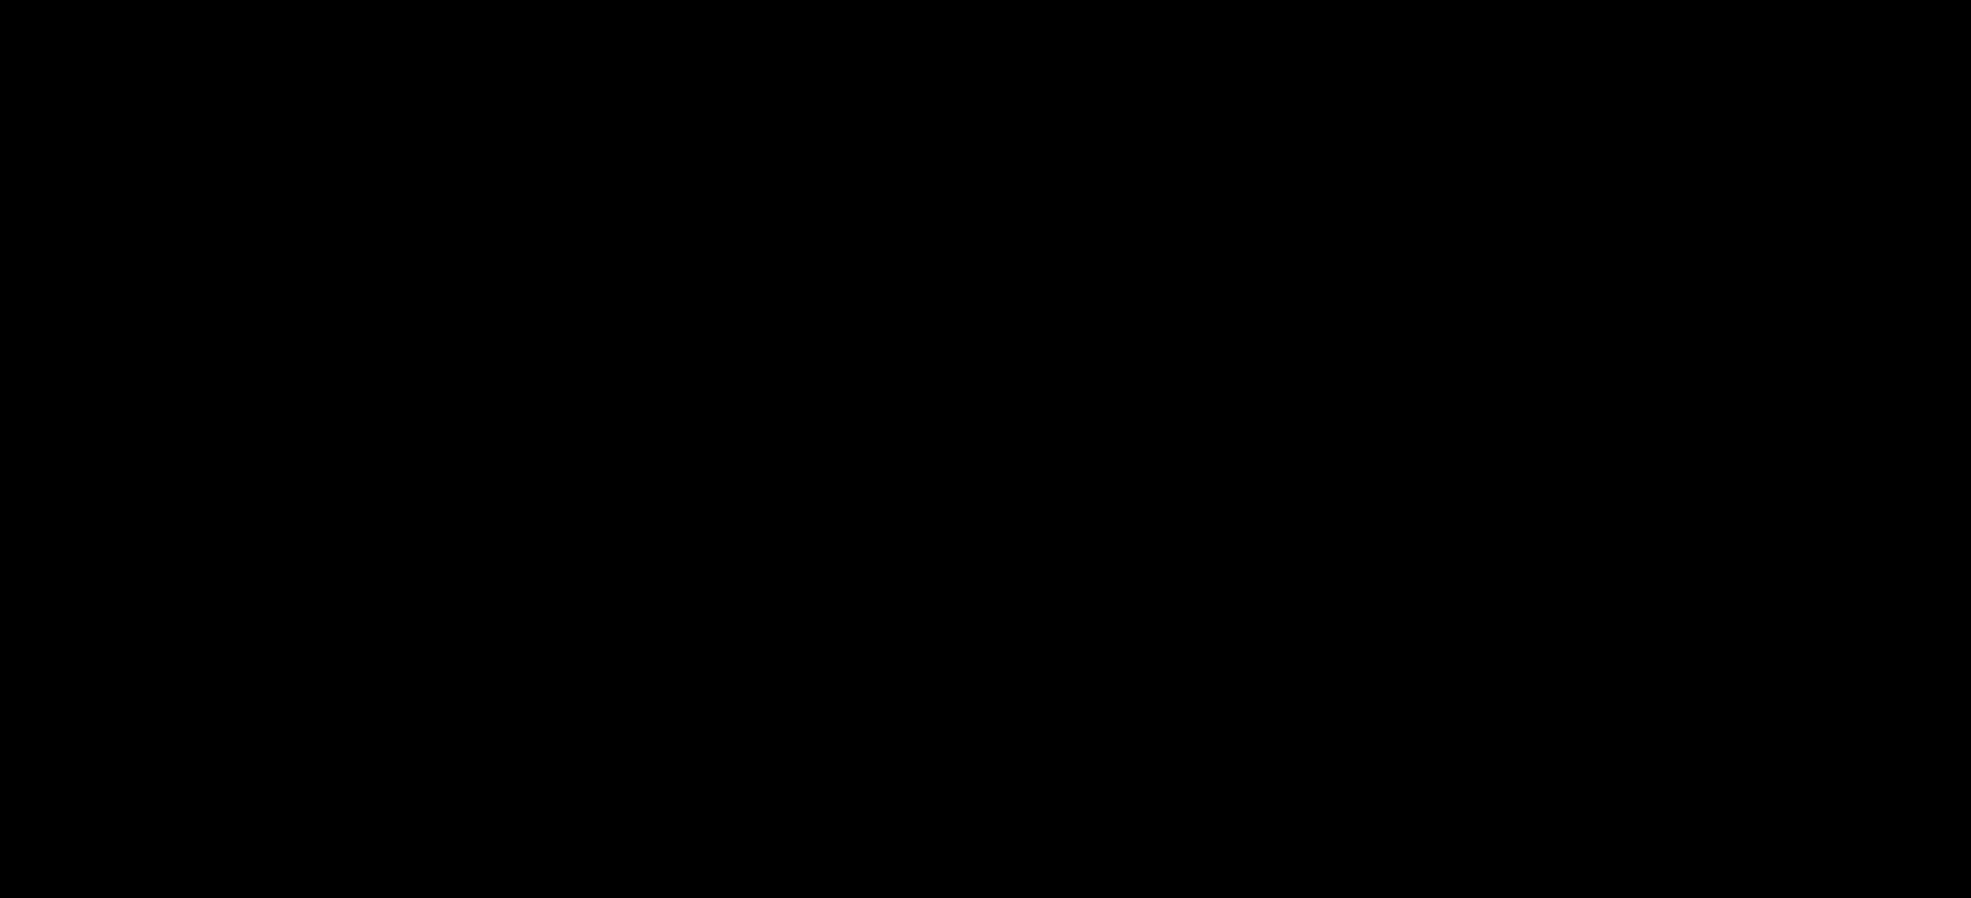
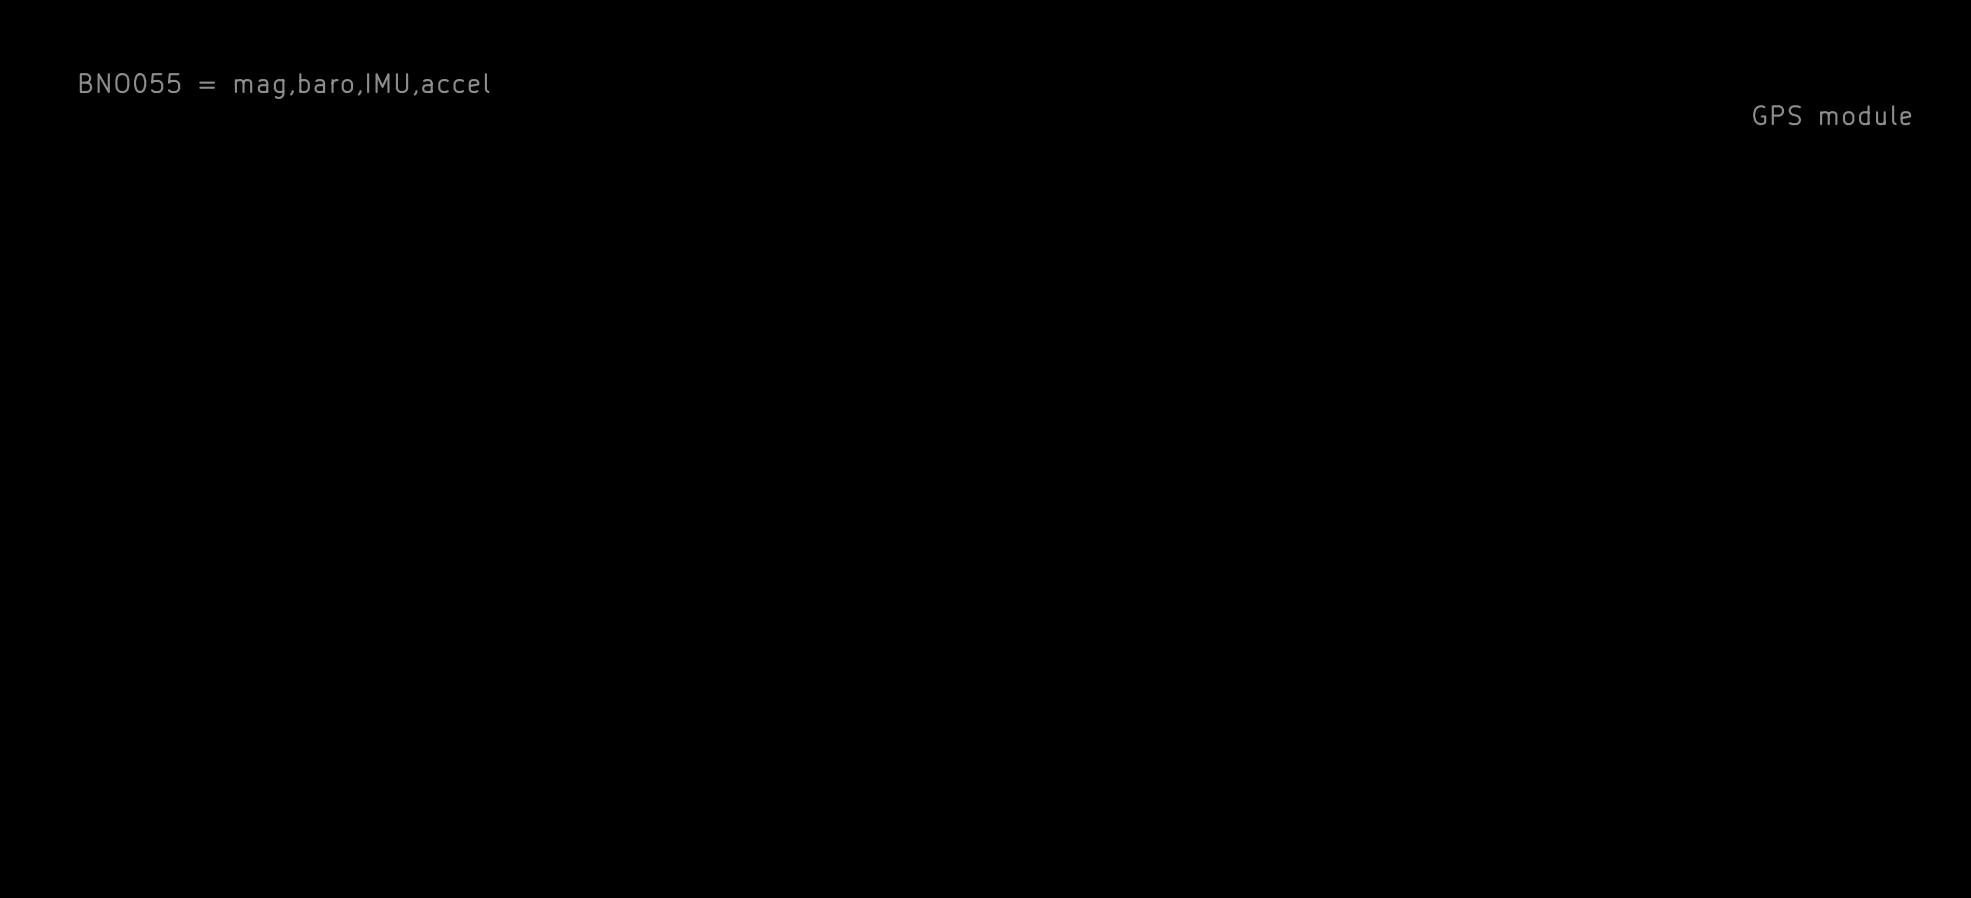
text: none -> BNO055 = mag,baro,IMU,accel (284, 86)
text: none -> GPS module (1832, 115)

